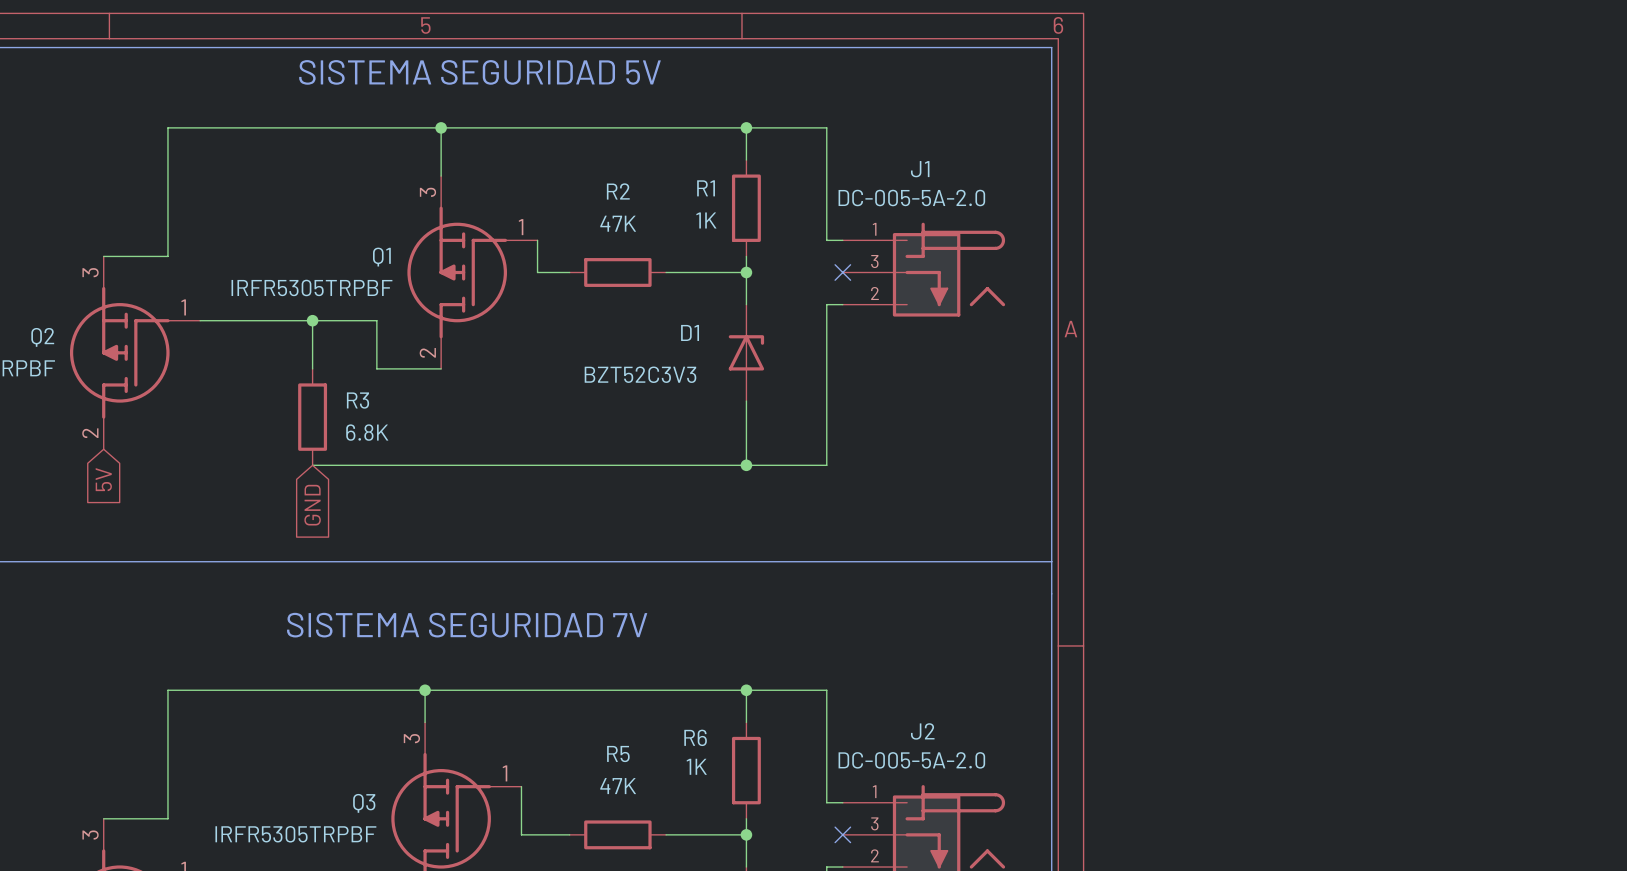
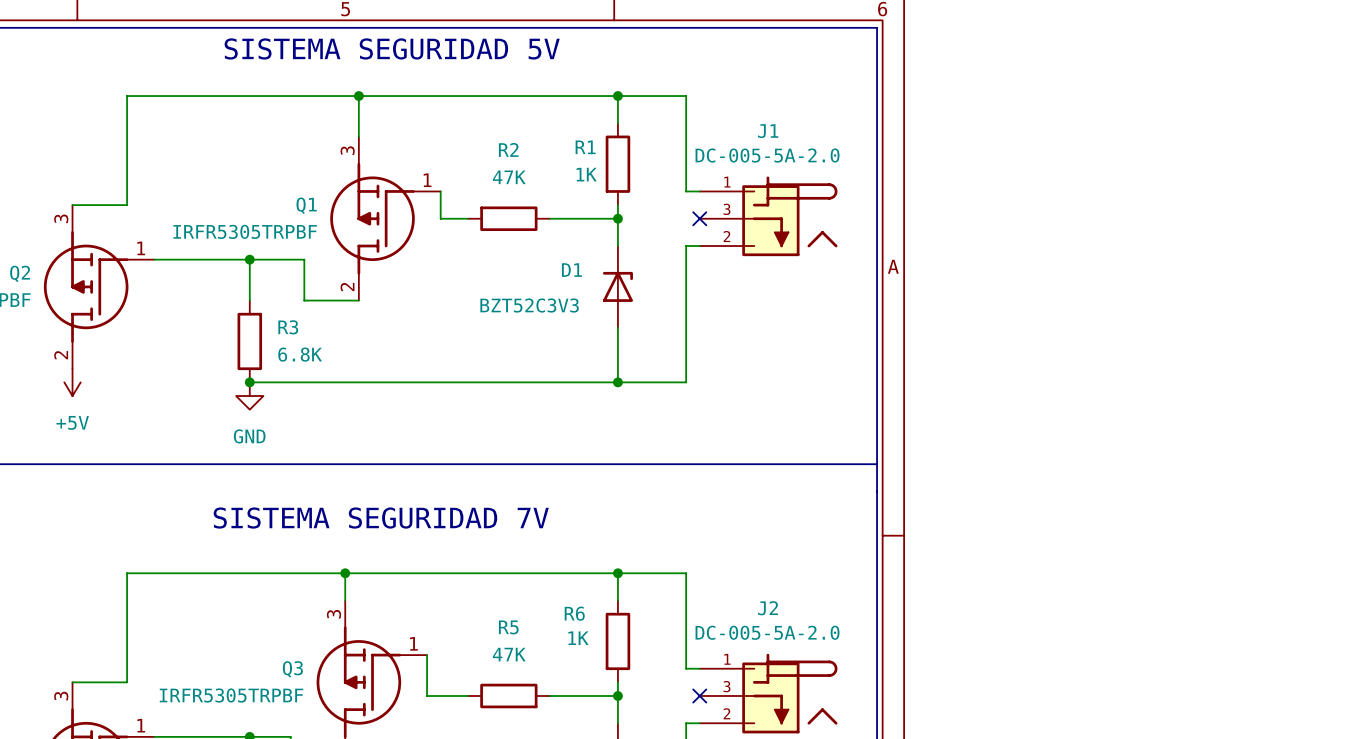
power symbol: none -> +5V (72, 382)
junction: none -> (249, 382)
global label: 5V (103, 479) -> none
power symbol: none -> GND (249, 396)
global label: GND (312, 505) -> none

